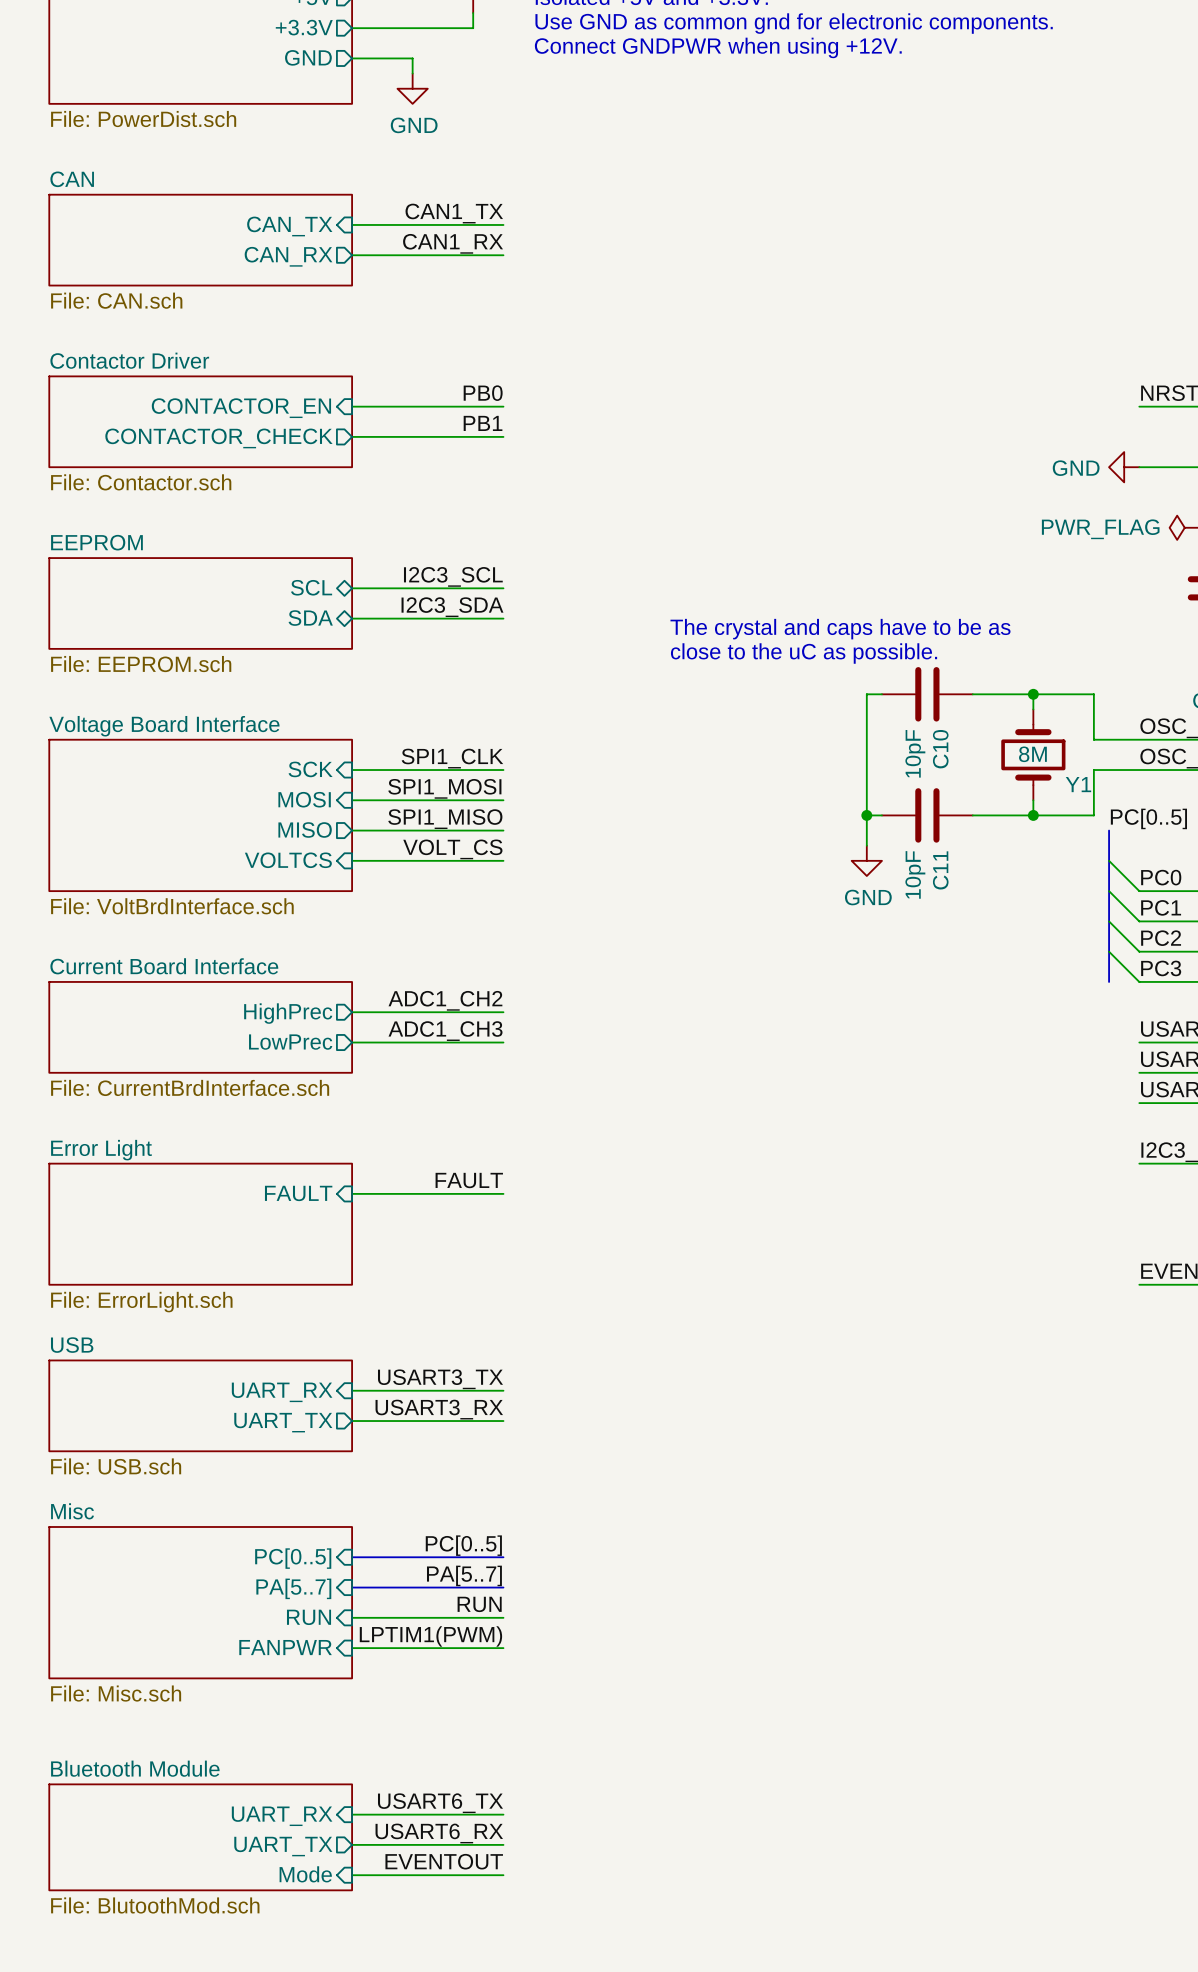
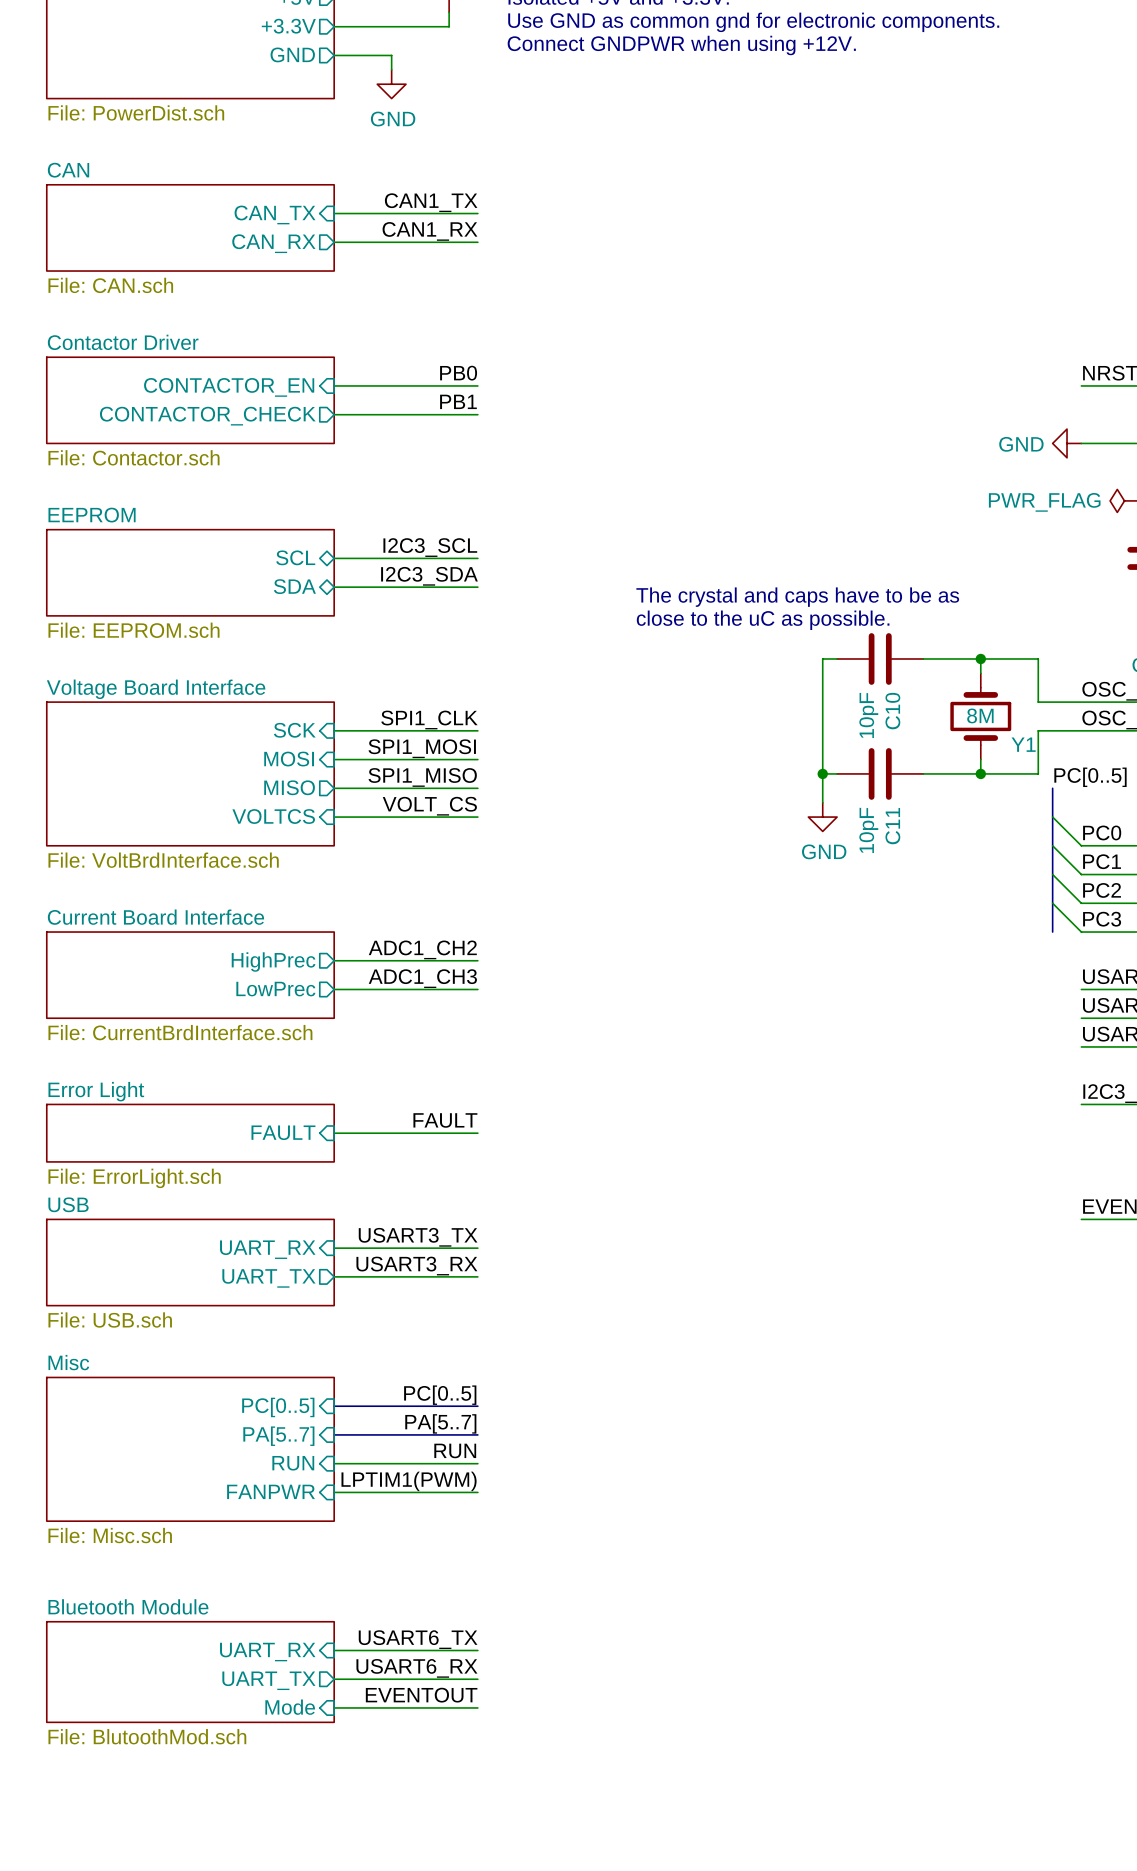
sheet Error Light: none -> File: ErrorLight.sch (190, 1133)
sheet Error Light: File: ErrorLight.sch (200, 1224) -> none
label position: USART3_TX (440, 1379) -> USART3_TX (418, 1237)
wire: (352, 1390) (503, 1390) -> (334, 1248) (477, 1248)
sheet pin position: UART_RX (282, 1392) -> UART_RX (267, 1249)
sheet USB position: (200, 1405) -> (190, 1262)
label position: USART3_RX (439, 1409) -> USART3_RX (416, 1266)
wire: (352, 1421) (503, 1421) -> (334, 1276) (477, 1276)
sheet pin position: UART_TX (283, 1422) -> UART_TX (268, 1278)
label position: PC[0..5] (463, 1545) -> PC[0..5] (440, 1395)
bus: (352, 1557) (503, 1557) -> (334, 1406) (477, 1406)
sheet pin position: PC[0..5] (293, 1558) -> PC[0..5] (278, 1407)
label position: PA[5..7] (464, 1575) -> PA[5..7] (440, 1423)
bus: (352, 1587) (503, 1587) -> (334, 1434) (477, 1434)
sheet pin position: PA[5..7] (293, 1588) -> PA[5..7] (278, 1436)
sheet Misc position: (200, 1602) -> (190, 1449)
label position: RUN (479, 1604) -> RUN (455, 1450)
sheet pin position: RUN (309, 1617) -> RUN (293, 1463)
wire: (352, 1617) (503, 1617) -> (334, 1463) (477, 1463)
label position: LPTIM1(PWM) (430, 1636) -> LPTIM1(PWM) (409, 1481)
sheet pin position: FANPWR (285, 1647) -> FANPWR (271, 1491)
wire: (352, 1648) (503, 1648) -> (334, 1492) (477, 1492)
label position: USART6_TX (440, 1803) -> USART6_TX (418, 1639)
wire: (352, 1814) (503, 1814) -> (334, 1650) (477, 1650)
sheet pin position: UART_RX (282, 1816) -> UART_RX (267, 1652)
label position: USART6_RX (439, 1833) -> USART6_RX (416, 1668)
sheet Bluetooth Module position: (200, 1837) -> (190, 1672)
wire: (352, 1844) (503, 1844) -> (334, 1679) (477, 1679)
sheet pin position: UART_TX (283, 1846) -> UART_TX (268, 1680)
label position: EVENTOUT (444, 1861) -> EVENTOUT (421, 1695)
sheet pin position: Mode (305, 1874) -> Mode (290, 1707)
wire: (352, 1875) (503, 1875) -> (334, 1707) (477, 1707)

